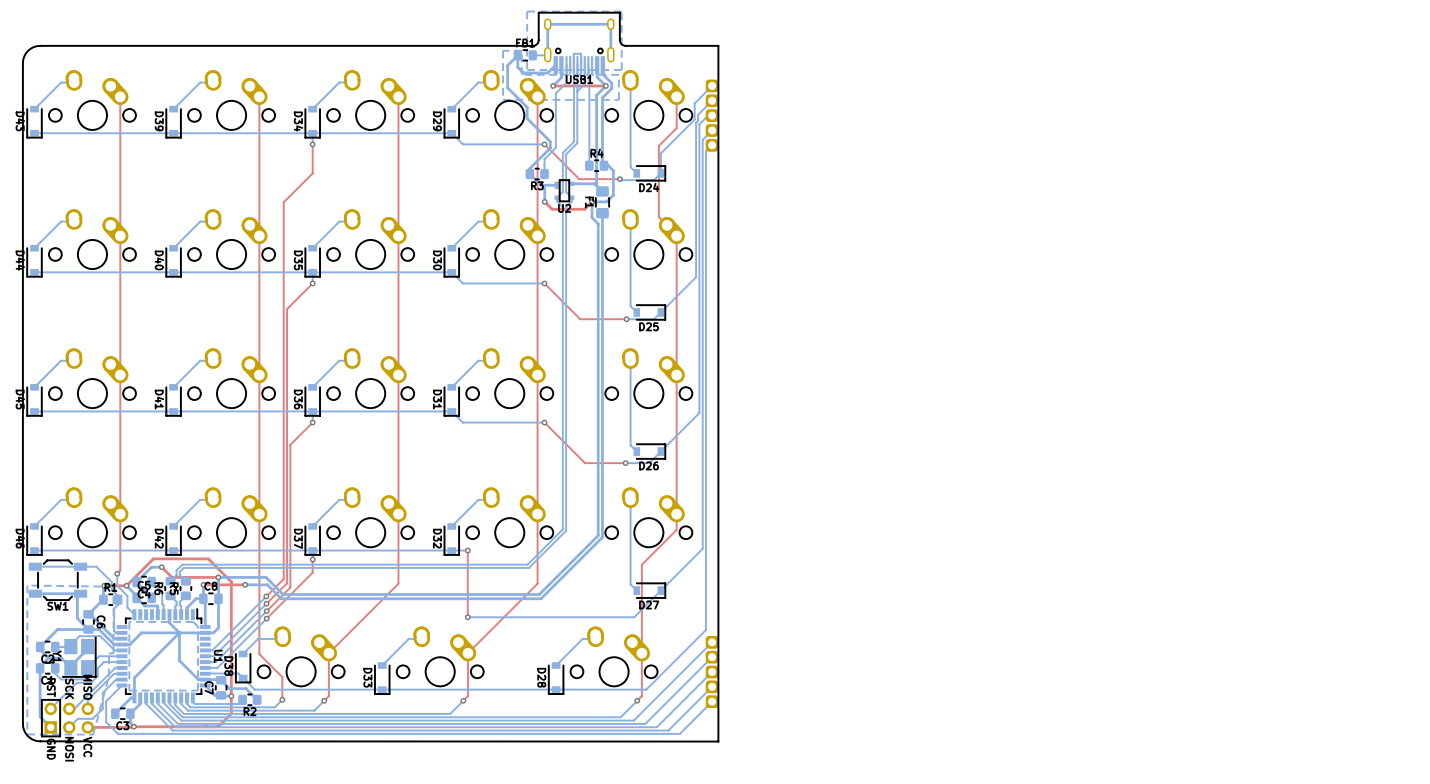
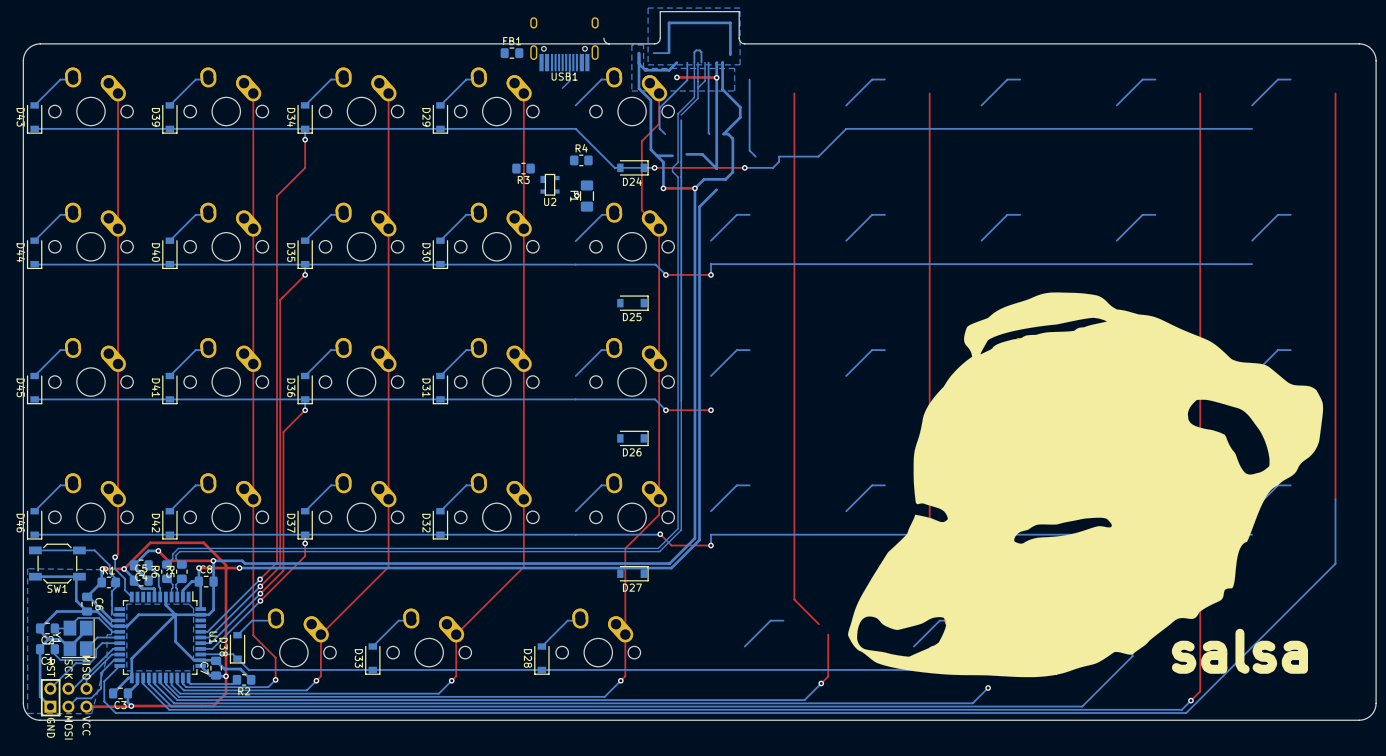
bottom zone outline: (621, 11) (621, 69) (527, 69) (527, 11) (621, 11) -> (740, 8) (740, 64) (648, 64) (648, 8) (740, 8)
board edge: (619, 40) (619, 12) (538, 12) (538, 40) (532, 45) -> (609, 43) (519, 43)
board edge: (672, 45) (718, 45) (718, 741) (40, 741) -> (654, 43) (660, 38) (660, 11) (739, 11) (739, 38) (744, 43) (1359, 43) (1371, 48) (1376, 60) (1376, 703) (1371, 715) (1359, 720) (40, 720)
bottom zone outline: none -> (643, 45) (643, 68) (734, 68) (734, 90) (631, 90) (631, 45) (643, 45)
bottom zone outline: (521, 50) (521, 74) (618, 74) (618, 99) (503, 99) (503, 50) (521, 50) -> none
bottom track: (610, 54) (610, 24) (547, 24) (547, 54) (532, 55) -> none
bottom track: none -> (639, 53) (639, 88) (650, 100) (650, 149) (663, 162) (663, 188)
bottom track: none -> (653, 53) (669, 52) (669, 22) (730, 22) (730, 54)
bottom track: (555, 65) (547, 72) (523, 72) (517, 67) (517, 55) (507, 65) (507, 87) (527, 107) (527, 118) (550, 141) (550, 148) (529, 168) (529, 174) (544, 188) (544, 201) -> none
bottom track: (561, 65) (561, 77) (553, 85) -> none
bottom track: (566, 65) (566, 82) (555, 93) (555, 147) (544, 159) (544, 174) -> none
bottom track: (577, 65) (577, 143) (566, 154) (566, 192) (571, 197) (571, 201) (566, 207) (566, 530) (528, 567) -> none
bottom track: (581, 65) (581, 54) (574, 53) (574, 141) (562, 152) (562, 192) (557, 197) (557, 201) (562, 207) (562, 529) (527, 564) -> (701, 62) (701, 52) (696, 50) (694, 52) (694, 97) (678, 113) (678, 162) (672, 167) (672, 171) (678, 177) (678, 528) (658, 548) (514, 548)
bottom track: (588, 65) (589, 165) -> none
bottom track: (597, 65) (597, 77) (605, 85) (596, 95) (596, 185) -> none
bottom track: (602, 65) (602, 74) (611, 83) (611, 88) (602, 97) (602, 164) (608, 165) (613, 170) (613, 195) (606, 201) (592, 201) (592, 217) (598, 223) (598, 535) (539, 594) (283, 594) (266, 577) (248, 577) -> (722, 62) (722, 89) (740, 107) (740, 117) (723, 134) (728, 134) (732, 138) (732, 172) (725, 179) (704, 179) (694, 188) (694, 538) (669, 563) (244, 563) (242, 560)
bottom track: none -> (676, 62) (669, 70) (645, 70) (639, 63)
bottom track: none -> (687, 62) (687, 80) (659, 107) (659, 128) (665, 134)
bottom track: none -> (697, 62) (697, 98) (681, 115)
bottom track: none -> (705, 62) (705, 80) (697, 88)
bottom track: none -> (708, 62) (709, 134)
bottom track: none -> (717, 62) (716, 168)
top track: none -> (676, 77) (716, 77)
via: none -> (676, 77)
via: none -> (716, 77)
bottom track: (630, 82) (630, 167) (636, 173) -> (614, 79) (601, 79) (575, 105)
bottom track: none -> (749, 79) (749, 150) (755, 156)
bottom track: none -> (884, 79) (872, 79) (846, 105)
bottom track: none -> (1020, 79) (1007, 79) (981, 105)
bottom track: none -> (1155, 79) (1142, 79) (1116, 105)
bottom track: none -> (1290, 79) (1277, 79) (1252, 105)
via: (553, 85) -> none
top track: (605, 85) (553, 85) -> none
via: (605, 85) -> none
bottom track: (712, 85) (694, 103) (694, 119) (660, 153) (660, 173) (654, 180) (619, 179) -> none
top track: none -> (794, 93) (794, 599) (818, 624)
top track: none -> (929, 93) (929, 565) (988, 624)
top track: none -> (1200, 93) (1200, 691) (1190, 700)
top track: none -> (1335, 93) (1335, 499)
bottom track: (712, 100) (698, 114) (696, 122) (696, 277) (654, 319) (626, 319) -> none
bottom track: (712, 115) (708, 115) (699, 124) -> none
part: (712, 115) -> none
bottom track: (712, 130) (702, 139) (702, 548) (634, 617) (467, 617) -> none
bottom track: (451, 133) (462, 144) (544, 144) -> (440, 128) (575, 128) (614, 167) (654, 167)
bottom track: none -> (1252, 128) (846, 128) (818, 156) (779, 156) (779, 161) (772, 167) (744, 167)
top track: (544, 144) (579, 179) (619, 179) -> none
via: (544, 144) -> none
bottom track: (712, 145) (706, 151) (706, 629) (646, 689) -> (1049, 669) (629, 669)
bottom track: none -> (686, 154) (702, 154) (716, 168)
via: none -> (654, 167)
top track: none -> (744, 167) (654, 167)
via: none -> (744, 167)
via: (619, 179) -> none
bottom track: (571, 183) (594, 183) (602, 191) -> none
bottom track: (557, 185) (541, 185) -> (672, 155) (656, 155)
via: none -> (663, 188)
top track: none -> (694, 188) (663, 188)
via: none -> (694, 188)
via: (544, 201) -> none
top track: (592, 201) (584, 209) (552, 209) (544, 201) -> none
bottom track: (602, 213) (602, 537) (541, 598) (281, 598) (267, 584) -> (716, 189) (699, 206) (699, 540) (671, 568) (261, 568)
bottom track: (630, 221) (630, 306) (636, 312) -> (614, 214) (602, 214) (575, 241)
bottom track: none -> (749, 214) (736, 214) (710, 240)
bottom track: none -> (884, 214) (872, 214) (846, 240)
bottom track: none -> (1020, 214) (1007, 214) (981, 240)
bottom track: none -> (1155, 214) (1142, 214) (1116, 240)
bottom track: none -> (1290, 214) (1277, 214) (1252, 240)
bottom track: (34, 272) (451, 272) (462, 283) (544, 283) -> none
bottom track: none -> (35, 264) (655, 264) (665, 274)
bottom track: none -> (1252, 264) (710, 264) (710, 274)
top track: (544, 283) (580, 319) (626, 319) -> none
via: (544, 283) -> none
via: none -> (665, 274)
top track: none -> (710, 274) (665, 274)
via: none -> (710, 274)
drawing: none -> [848, 292, 1324, 678]
via: (626, 319) -> none
bottom track: (630, 360) (630, 445) (636, 451) -> (614, 350) (601, 350) (575, 375)
bottom track: none -> (749, 350) (736, 350) (710, 375)
bottom track: none -> (884, 350) (872, 350) (846, 375)
bottom track: none -> (1290, 350) (1277, 350) (1252, 375)
bottom track: (451, 411) (462, 422) (544, 422) -> (440, 399) (655, 399) (665, 410)
bottom track: (699, 413) (649, 463) (625, 463) -> (681, 400) (681, 529) (659, 551) (515, 551)
top track: (544, 422) (585, 463) (625, 463) -> none
via: (544, 422) -> none
via: none -> (665, 410)
top track: none -> (710, 410) (665, 410)
via: none -> (710, 410)
via: (625, 463) -> none
bottom track: (630, 499) (630, 584) (636, 590) -> (614, 485) (601, 485) (575, 511)
bottom track: none -> (749, 485) (736, 485) (710, 511)
bottom track: none -> (884, 485) (872, 485) (846, 511)
bottom track: none -> (1290, 485) (1277, 485) (1252, 511)
top track: (467, 550) (467, 617) -> none
via: (467, 550) -> none
bottom track: none -> (660, 534) (455, 534)
top track: none -> (660, 534) (671, 545) (710, 545)
via: none -> (660, 534)
bottom track: none -> (1252, 534) (710, 534) (710, 545)
via: none -> (710, 545)
via: (467, 617) -> none
bottom track: none -> (783, 620) (770, 620) (744, 646)
bottom track: none -> (952, 620) (939, 620) (913, 646)
bottom track: (712, 642) (633, 720) -> (821, 683) (804, 700) (617, 700)
top track: none -> (828, 634) (828, 676) (821, 683)
bottom track: (712, 657) (645, 723) -> (988, 688) (972, 703) (628, 703)
text: none -> salsa (1239, 651)
bottom track: (712, 672) (656, 727) -> (1132, 634) (1132, 656) (1082, 706) (639, 706)
part: (712, 672) -> none
bottom track: (712, 686) (668, 730) -> (1190, 700) (1181, 709) (651, 709)
bottom track: (712, 701) (679, 733) -> (1335, 499) (1335, 563) (1186, 713) (662, 713)
via: none -> (821, 683)
via: none -> (988, 688)
via: none -> (1190, 700)

